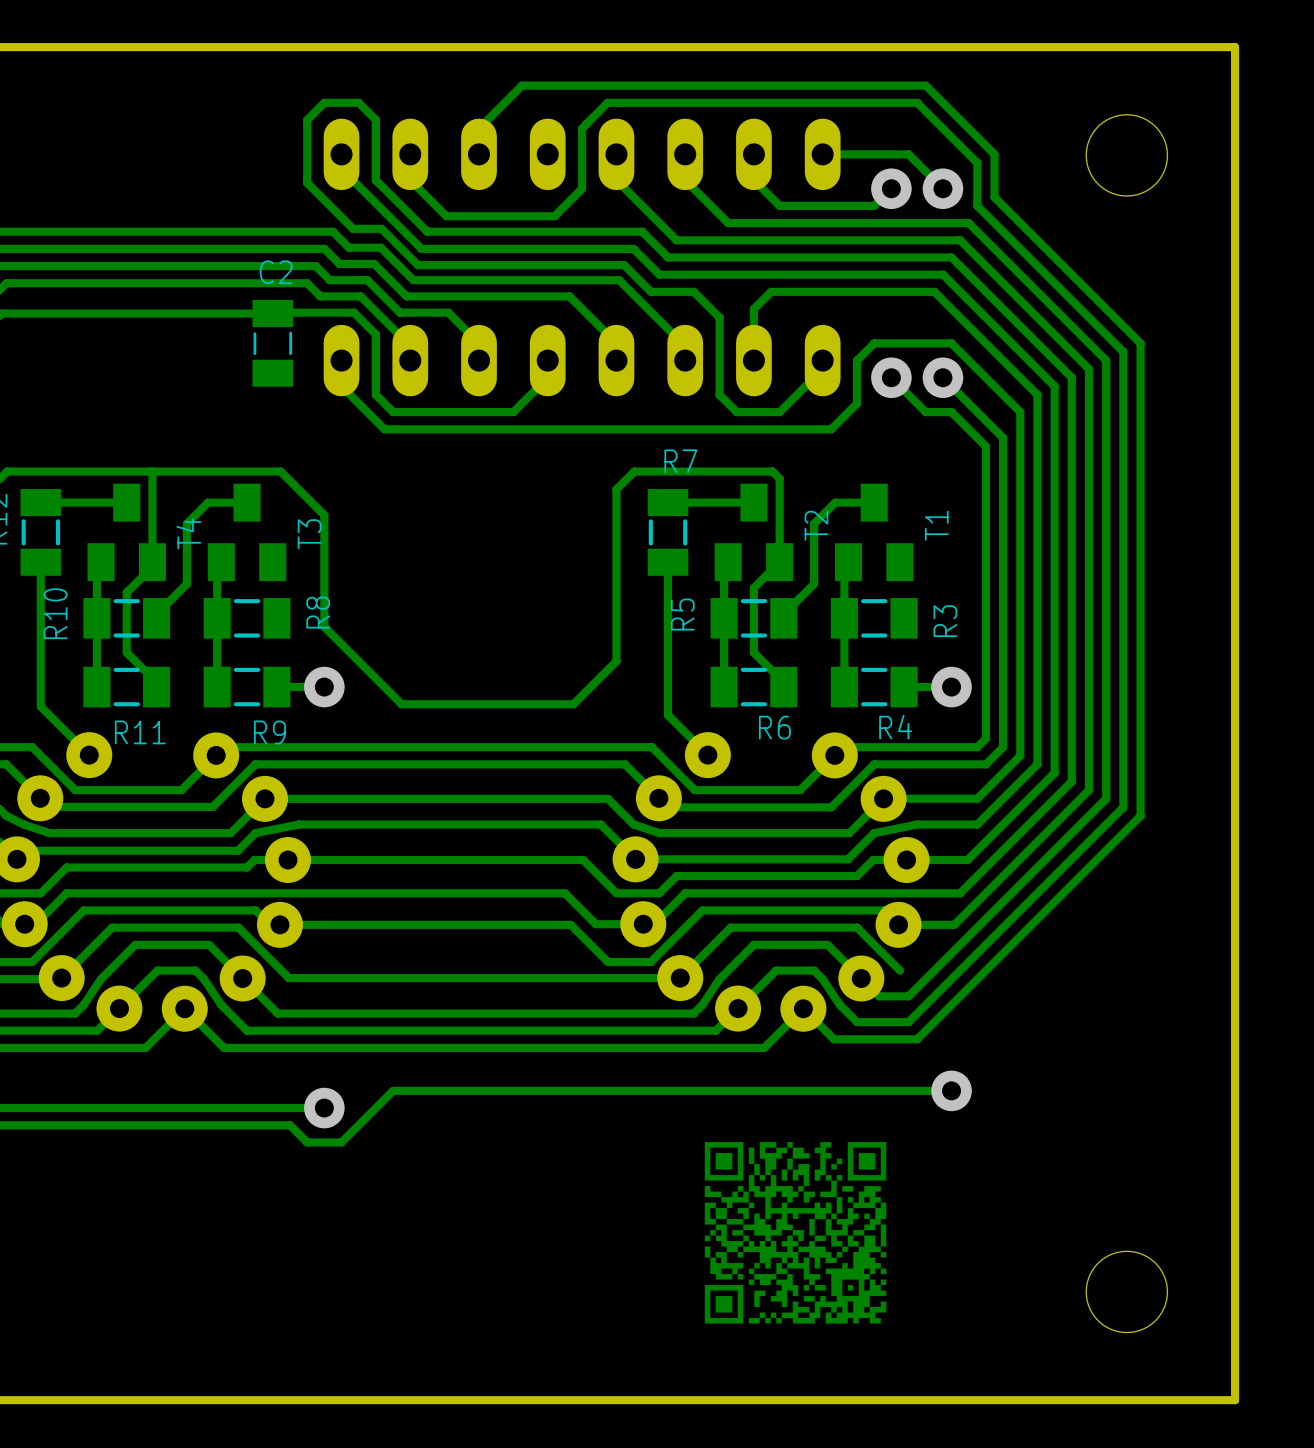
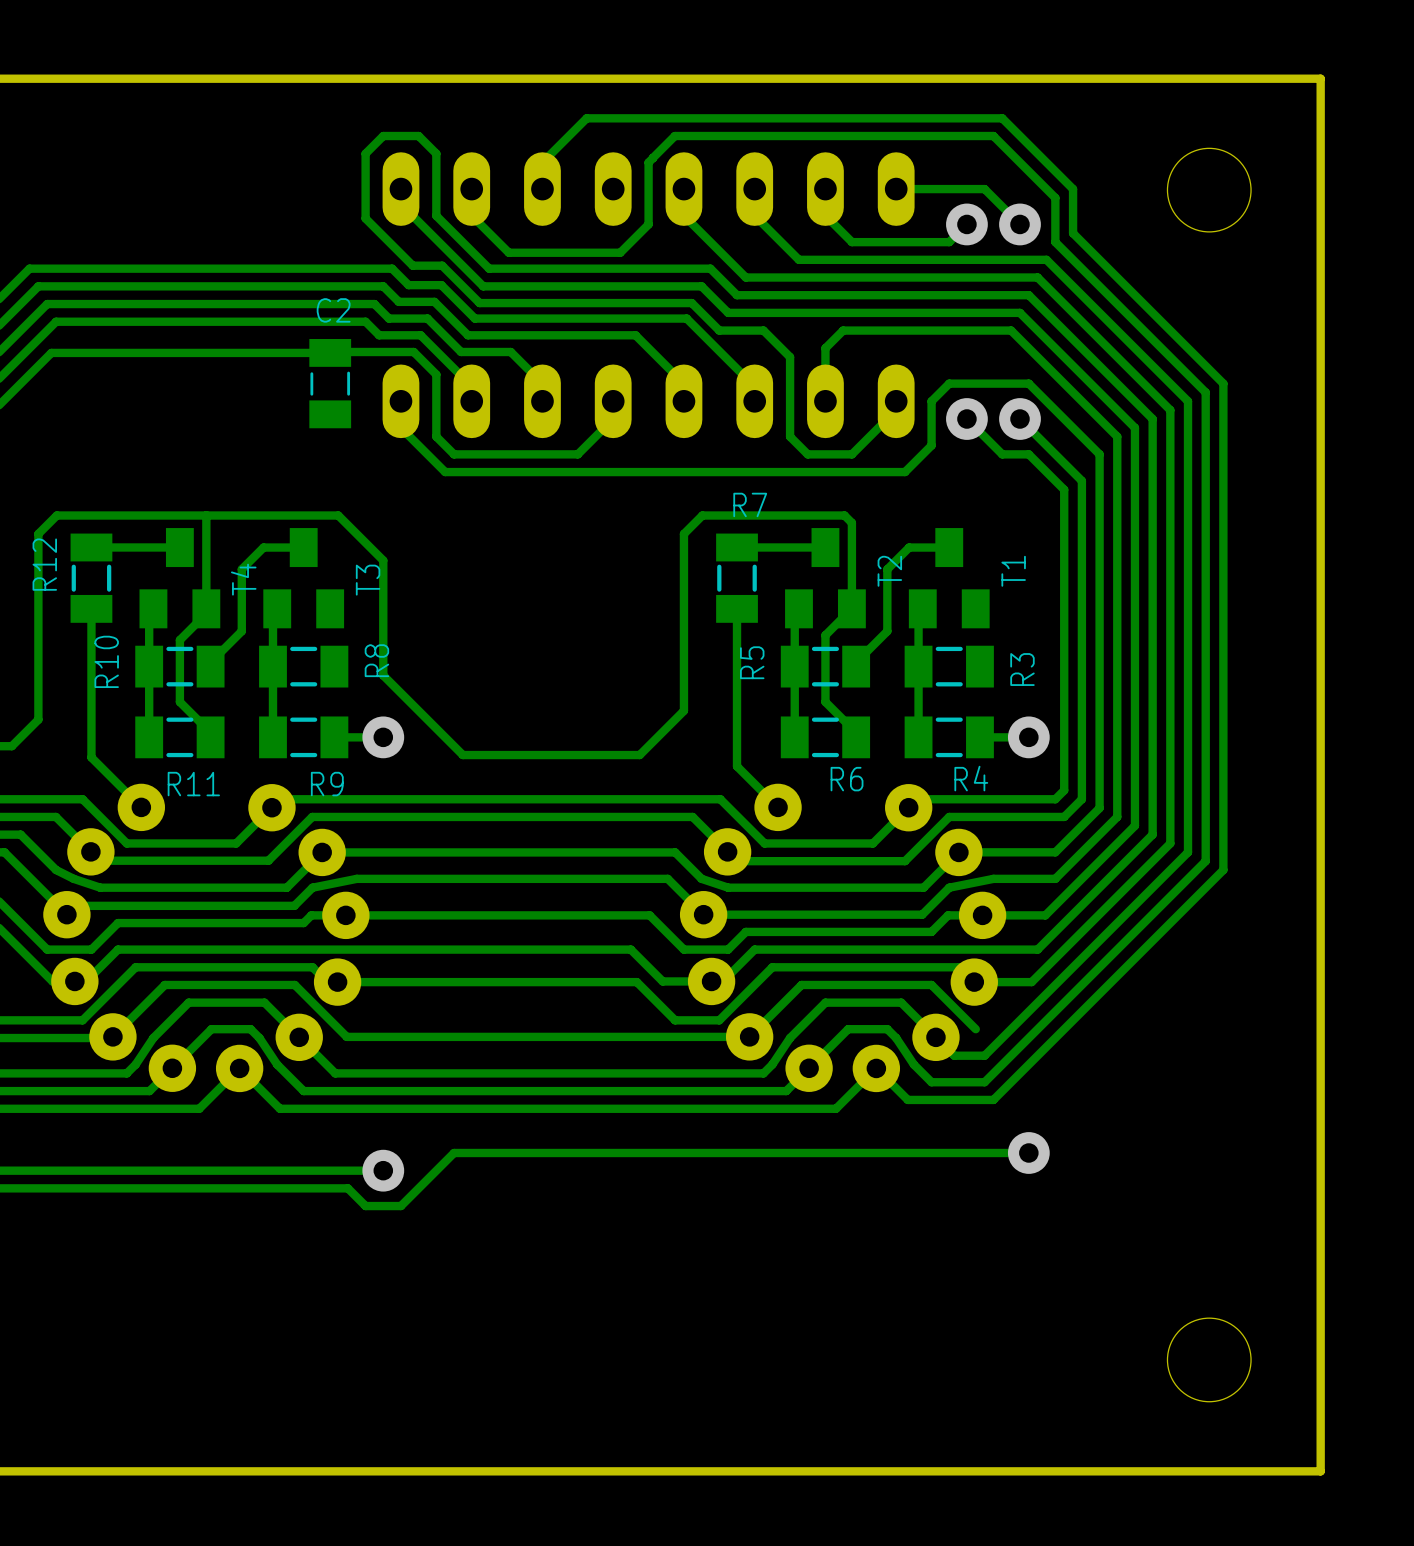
drawing: [704, 1142, 887, 1324] -> none

